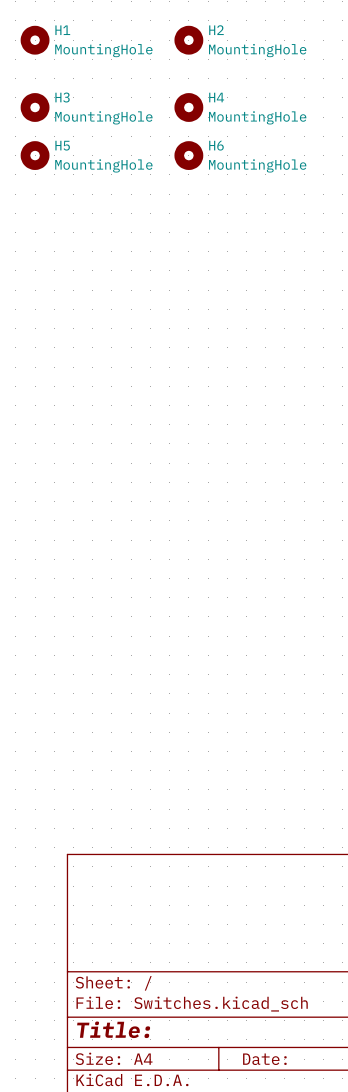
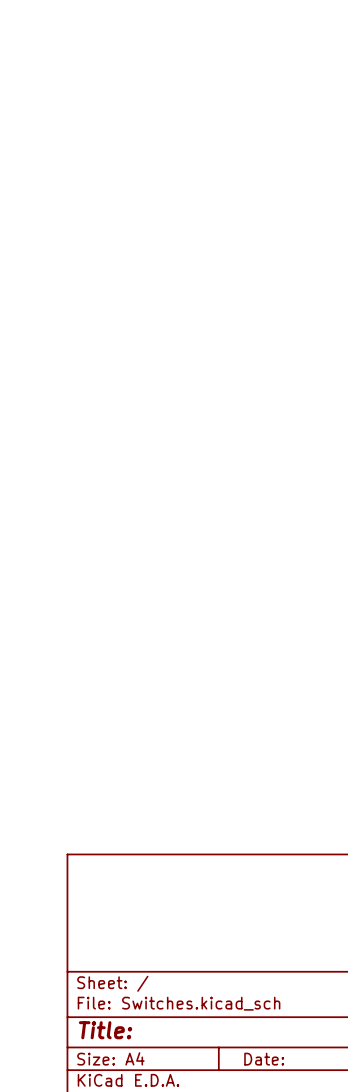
H1: MountingHole (35, 40) -> none
H2: MountingHole (188, 40) -> none
H3: MountingHole (35, 107) -> none
H4: MountingHole (188, 107) -> none
H5: MountingHole (35, 155) -> none
H6: MountingHole (188, 155) -> none

